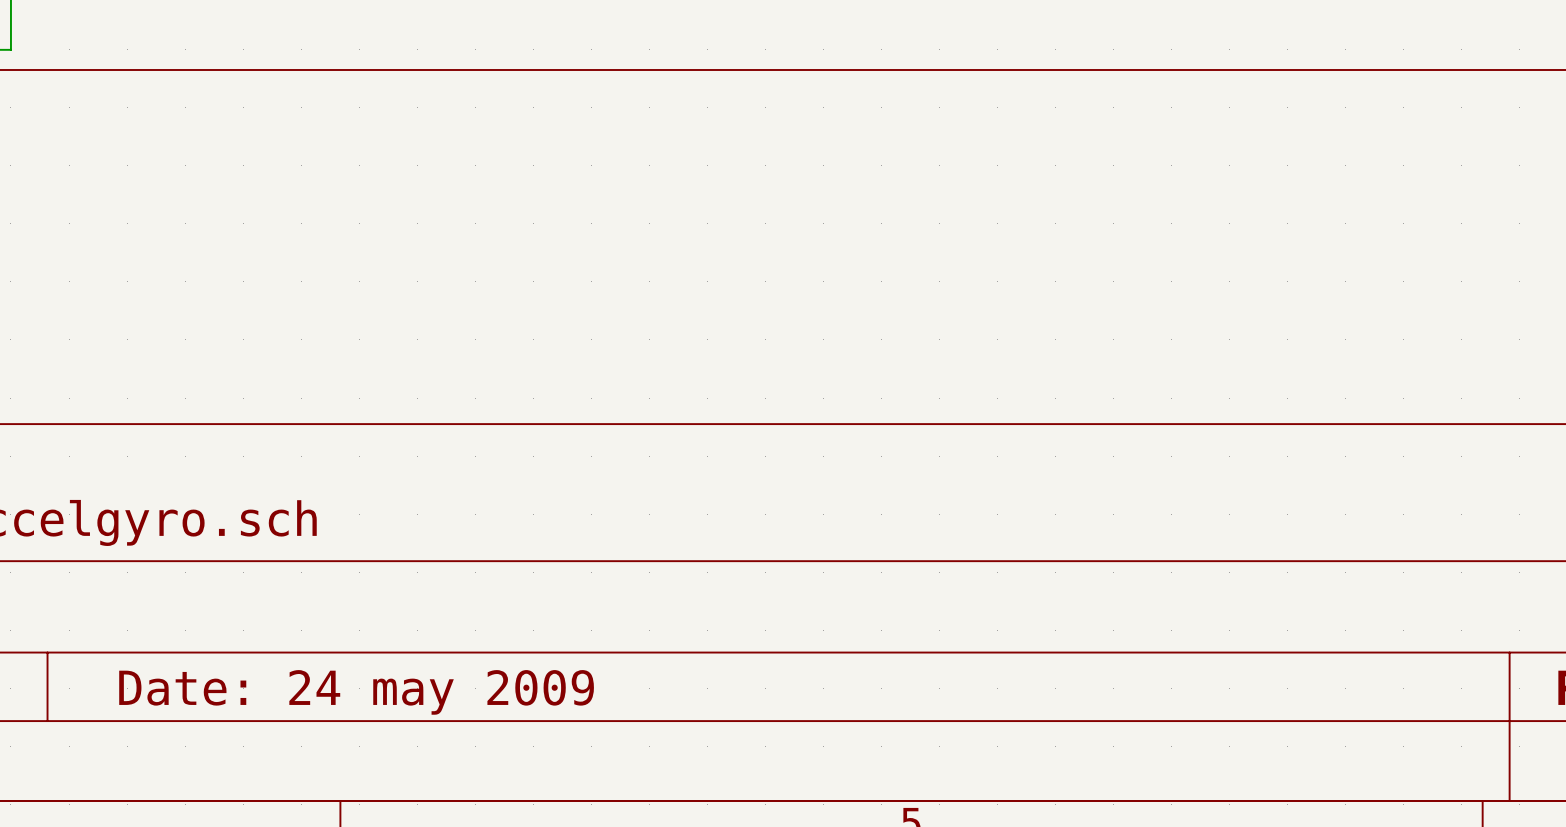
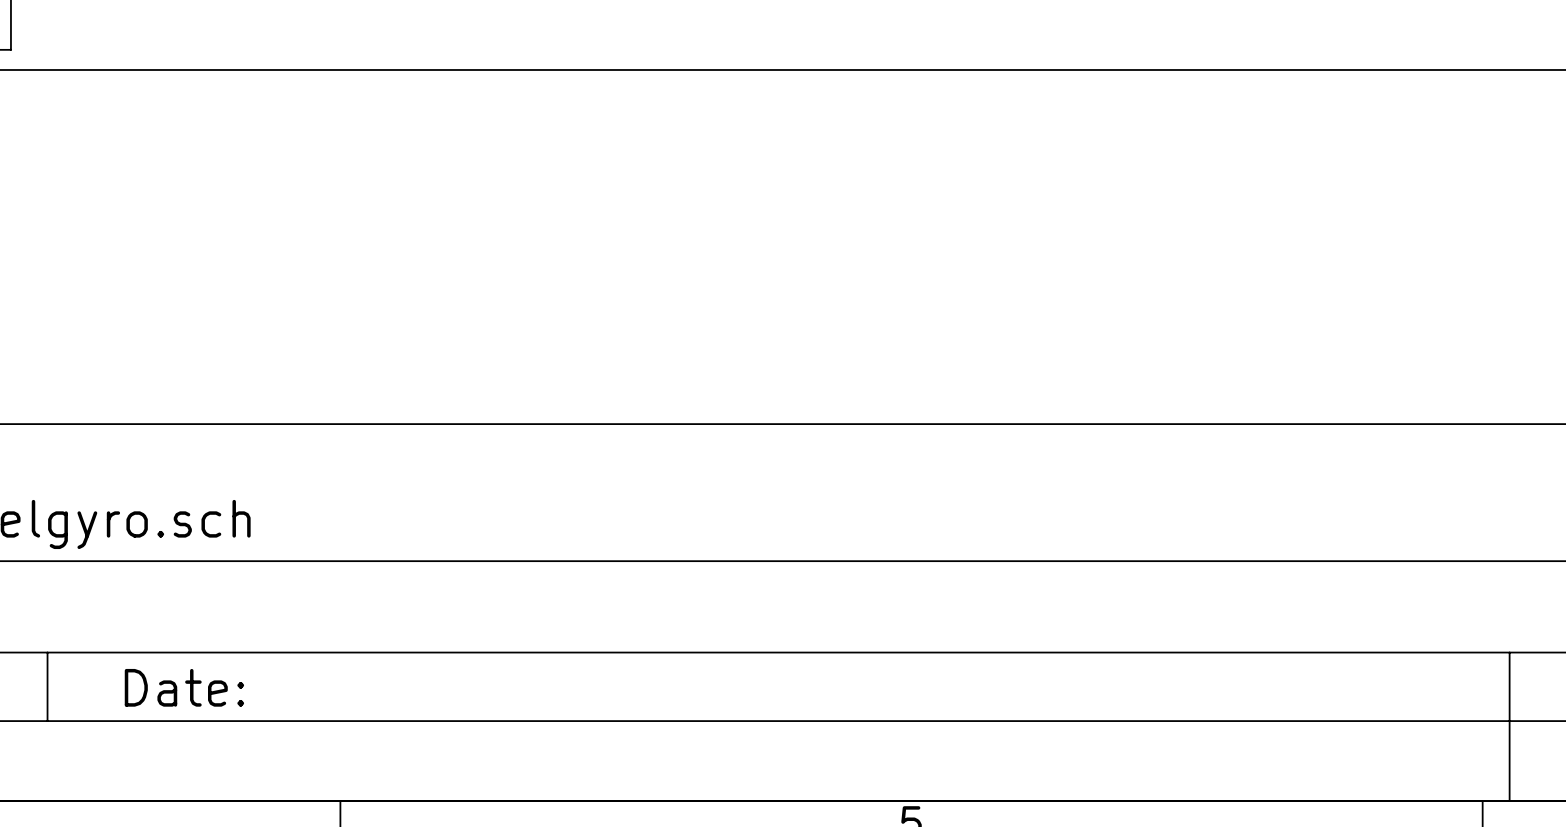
title block: Date: 24 may 2009 (356, 692) -> Date: (184, 687)

